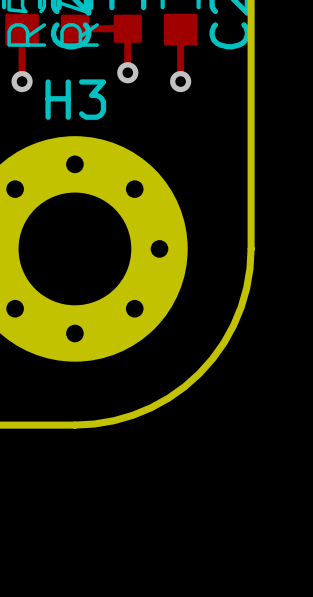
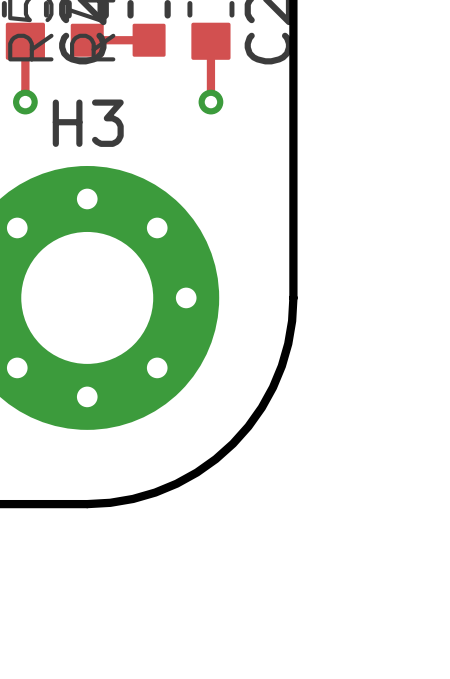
top track: (127, 28) (127, 72) -> none
via: (127, 72) -> none

